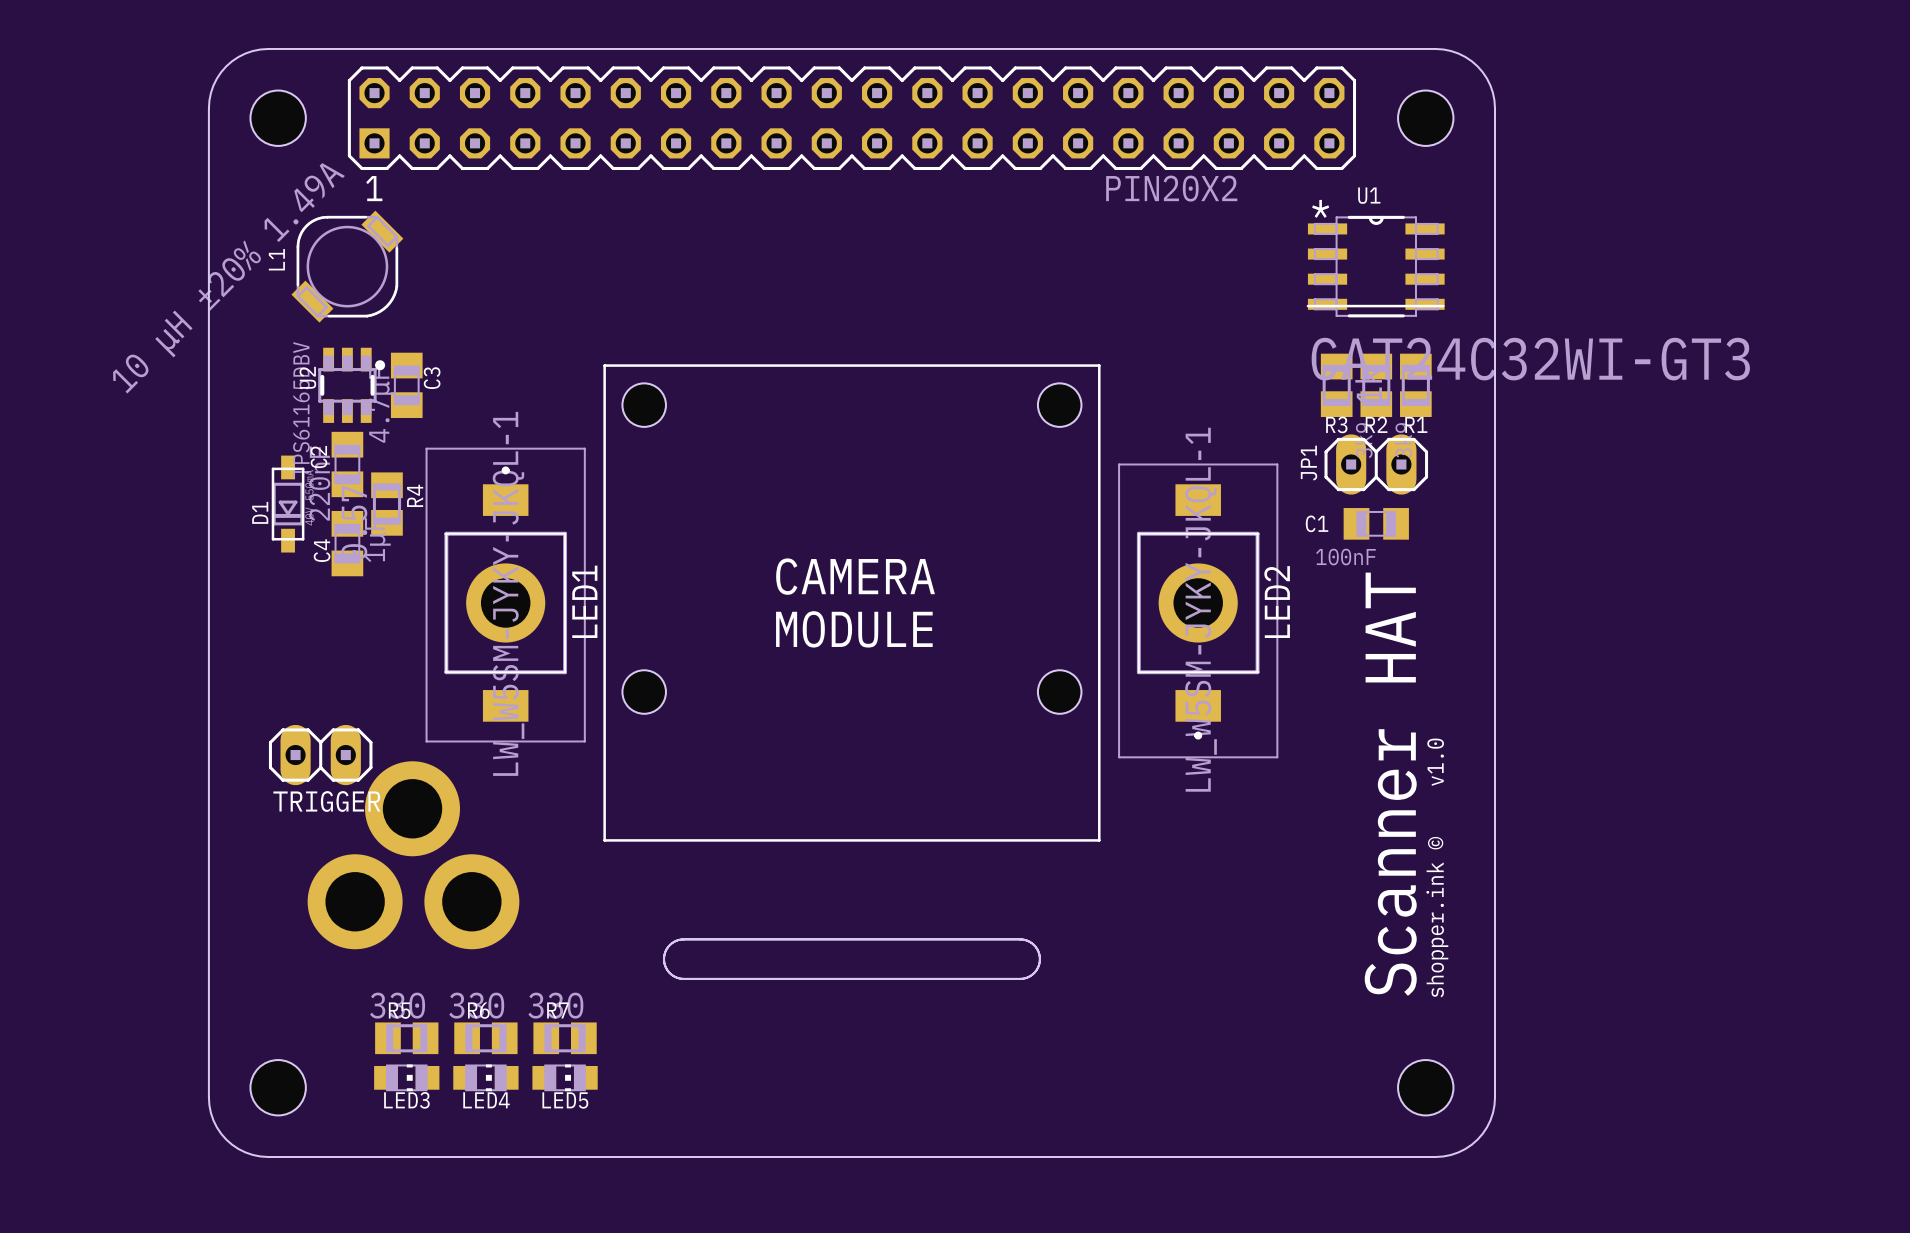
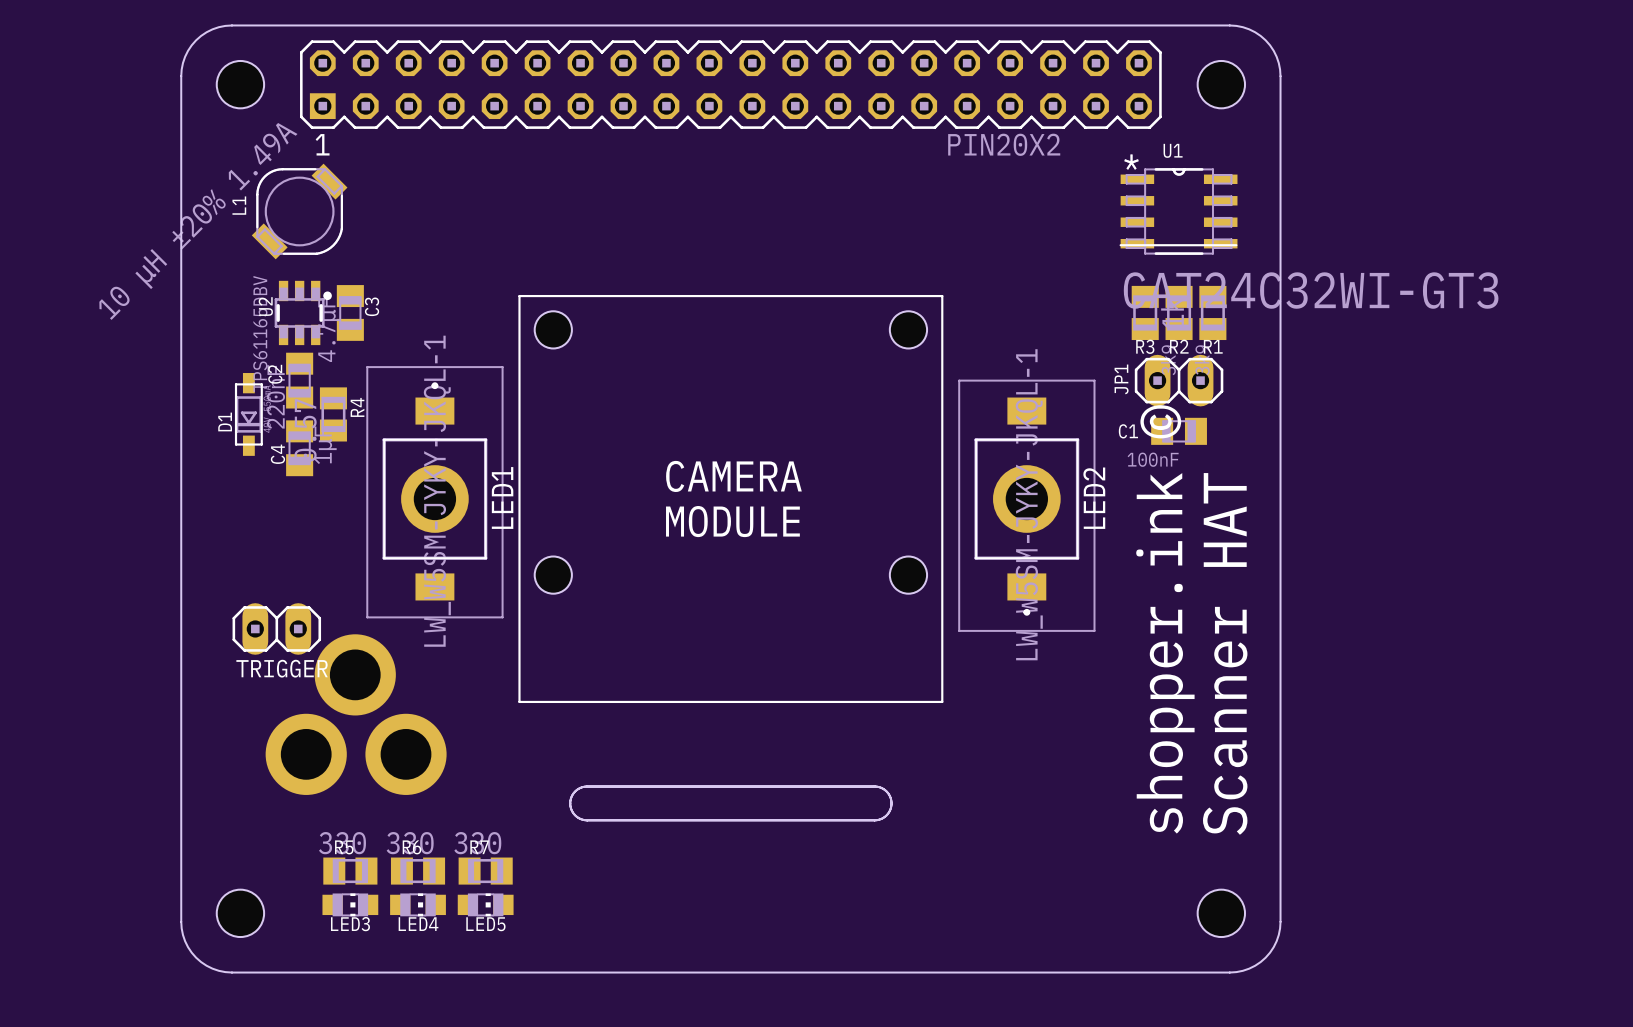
text: none -> shopper.ink © (1165, 619)
text position: Scanner HAT (1390, 784) -> Scanner HAT (1225, 653)
text: shopper.ink © v1.0 (1437, 867) -> none

